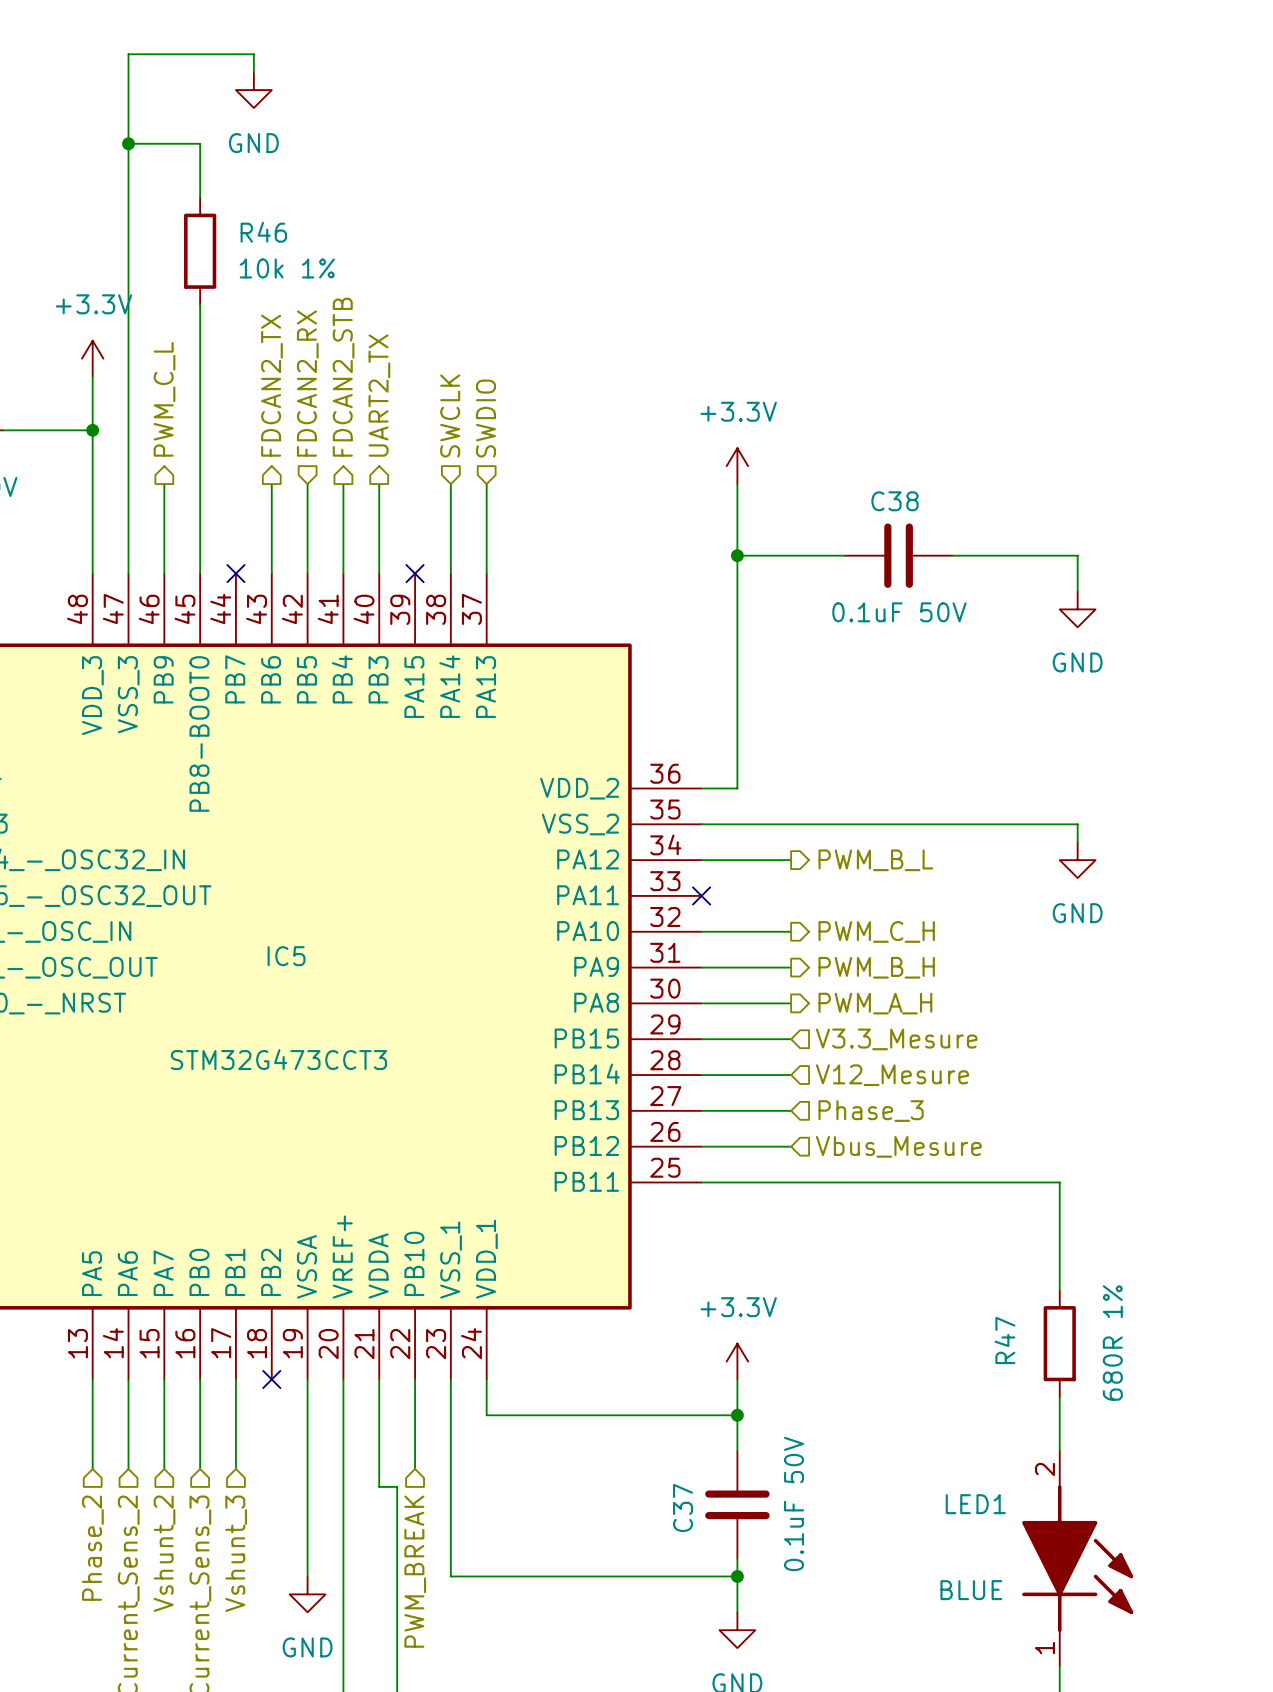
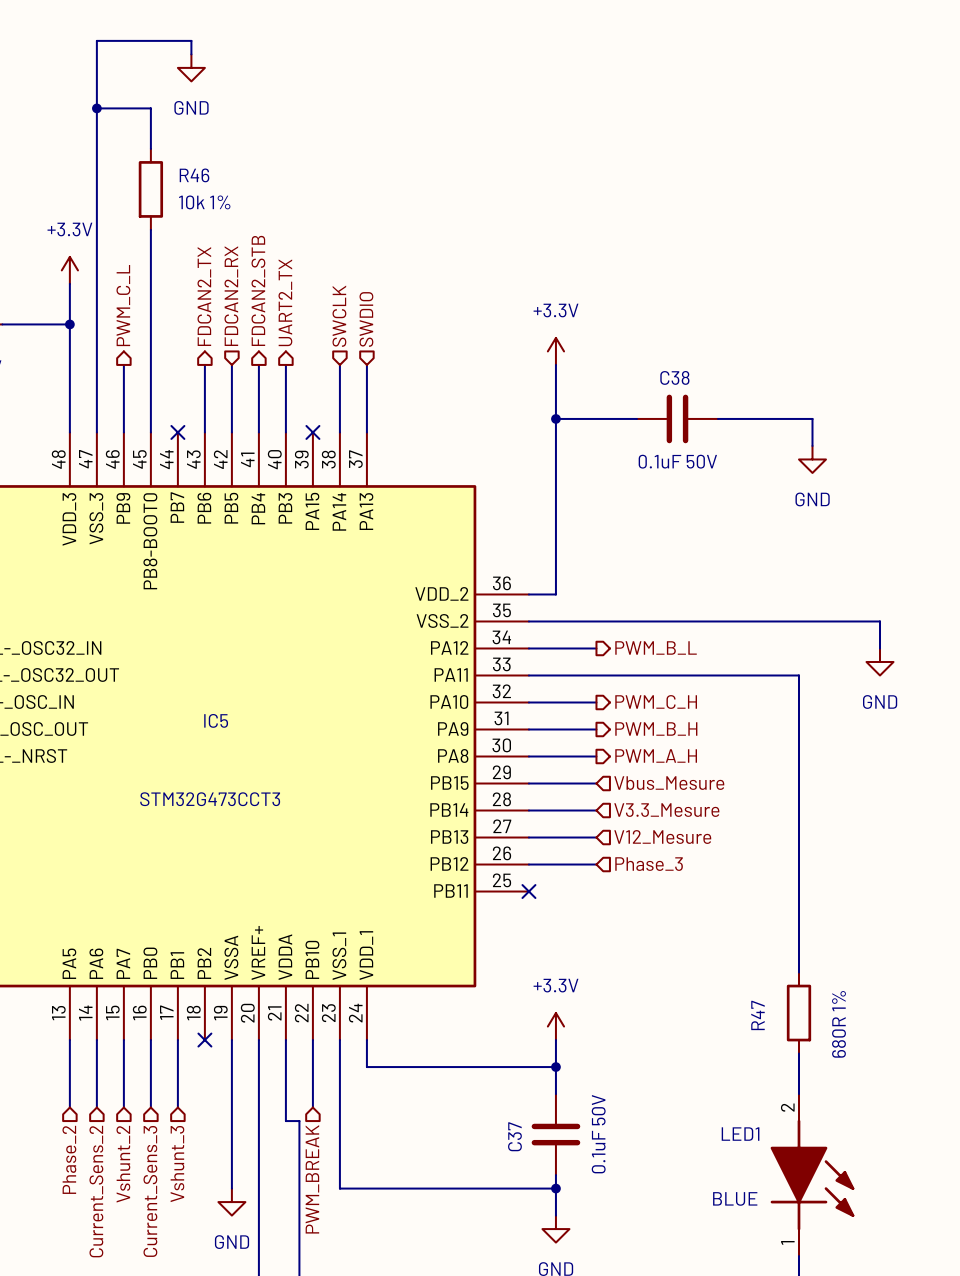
wire: (1077, 824) (1077, 842) -> (812, 621) (880, 621) (880, 648)
power symbol position: GND (1077, 860) -> GND (880, 661)
no-connect mark: (701, 895) -> none
hierarchical label: V3.3_Mesure (896, 1039) -> Vbus_Mesure (669, 783)
hierarchical label: V12_Mesure (892, 1075) -> V3.3_Mesure (666, 810)
hierarchical label: Phase_3 (871, 1111) -> V12_Mesure (662, 837)
hierarchical label: Vbus_Mesure (898, 1146) -> Phase_3 (649, 864)
wire: (701, 1182) (1059, 1182) -> (528, 675) (798, 675) (798, 891)
no-connect mark: none -> (528, 891)

